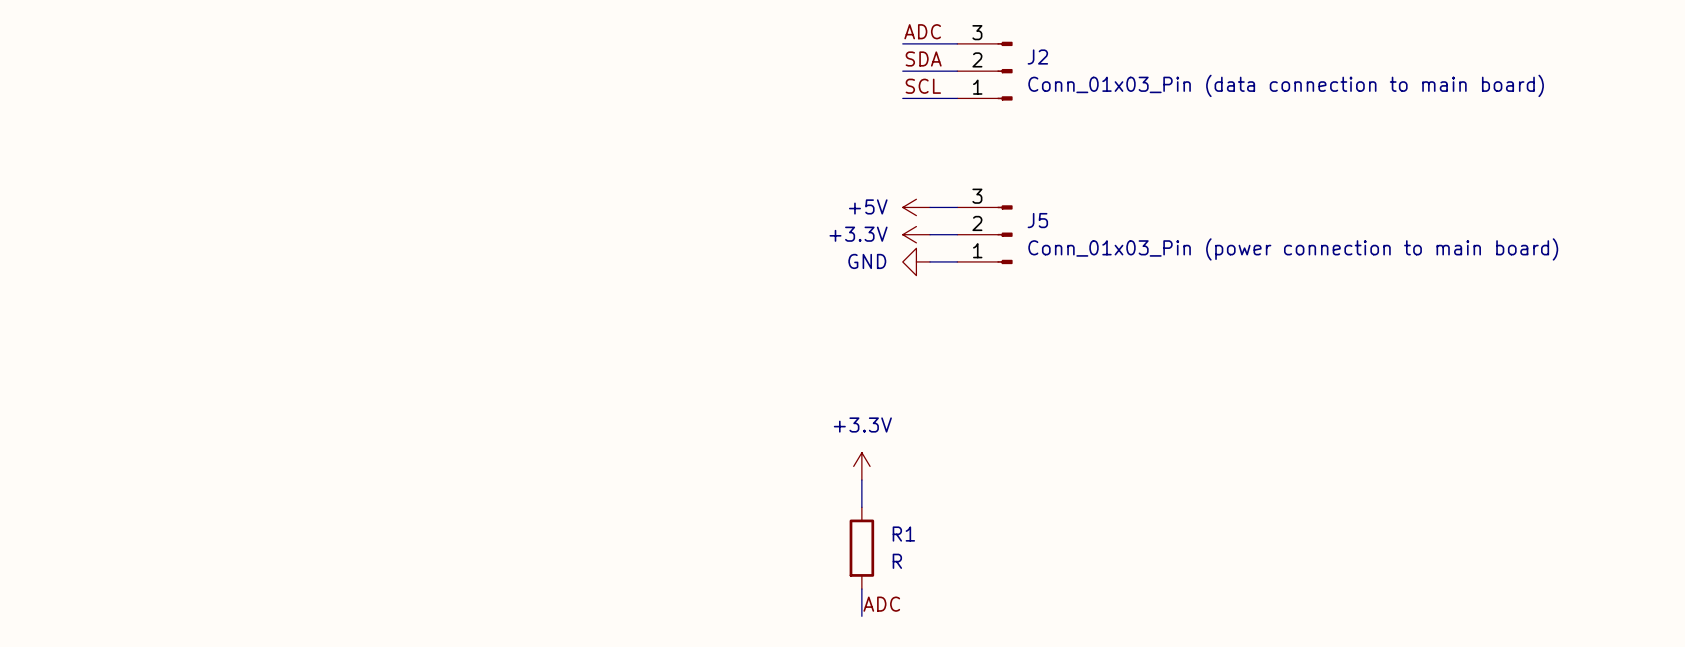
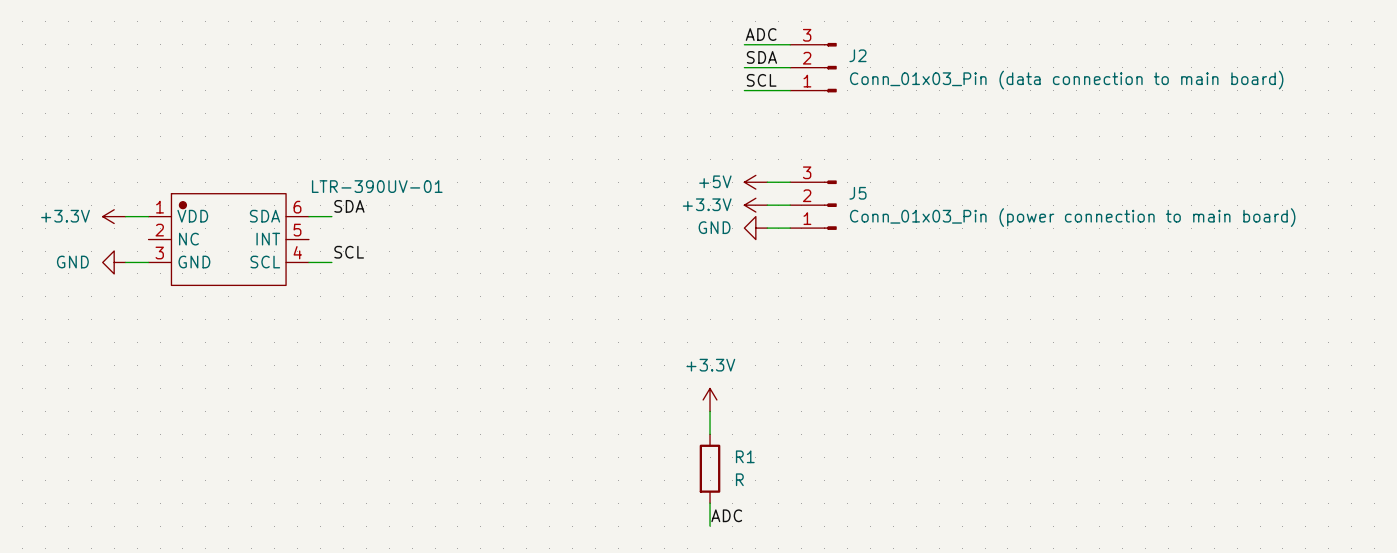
label: none -> SDA (349, 206)
power symbol: none -> +3.3V (114, 216)
wire: none -> (125, 216) (148, 216)
wire: none -> (308, 216) (331, 216)
LTR-390UV-01: none -> (228, 239)
label: none -> SCL (349, 252)
power symbol: none -> GND (114, 262)
wire: none -> (125, 262) (148, 262)
wire: none -> (308, 262) (331, 262)

